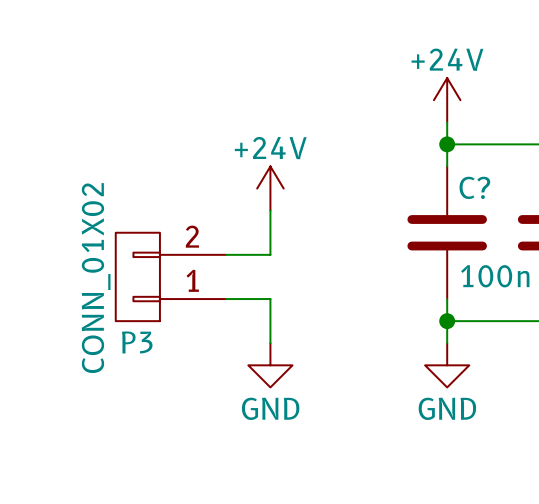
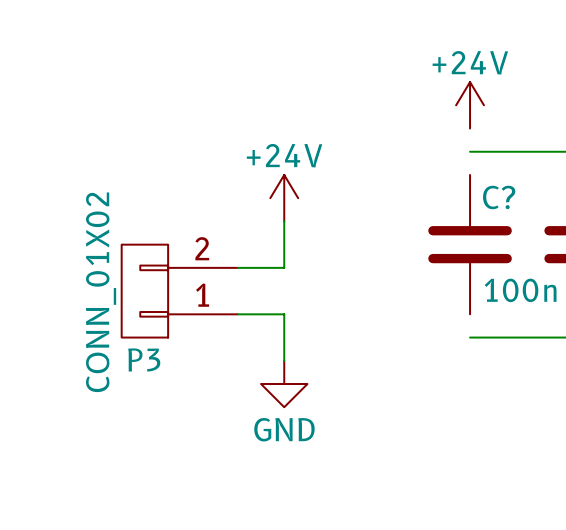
wire: (447, 122) (447, 166) -> none
junction: (447, 144) -> none
wire: (447, 299) (447, 343) -> none
junction: (447, 321) -> none
power symbol: GND (447, 365) -> none

